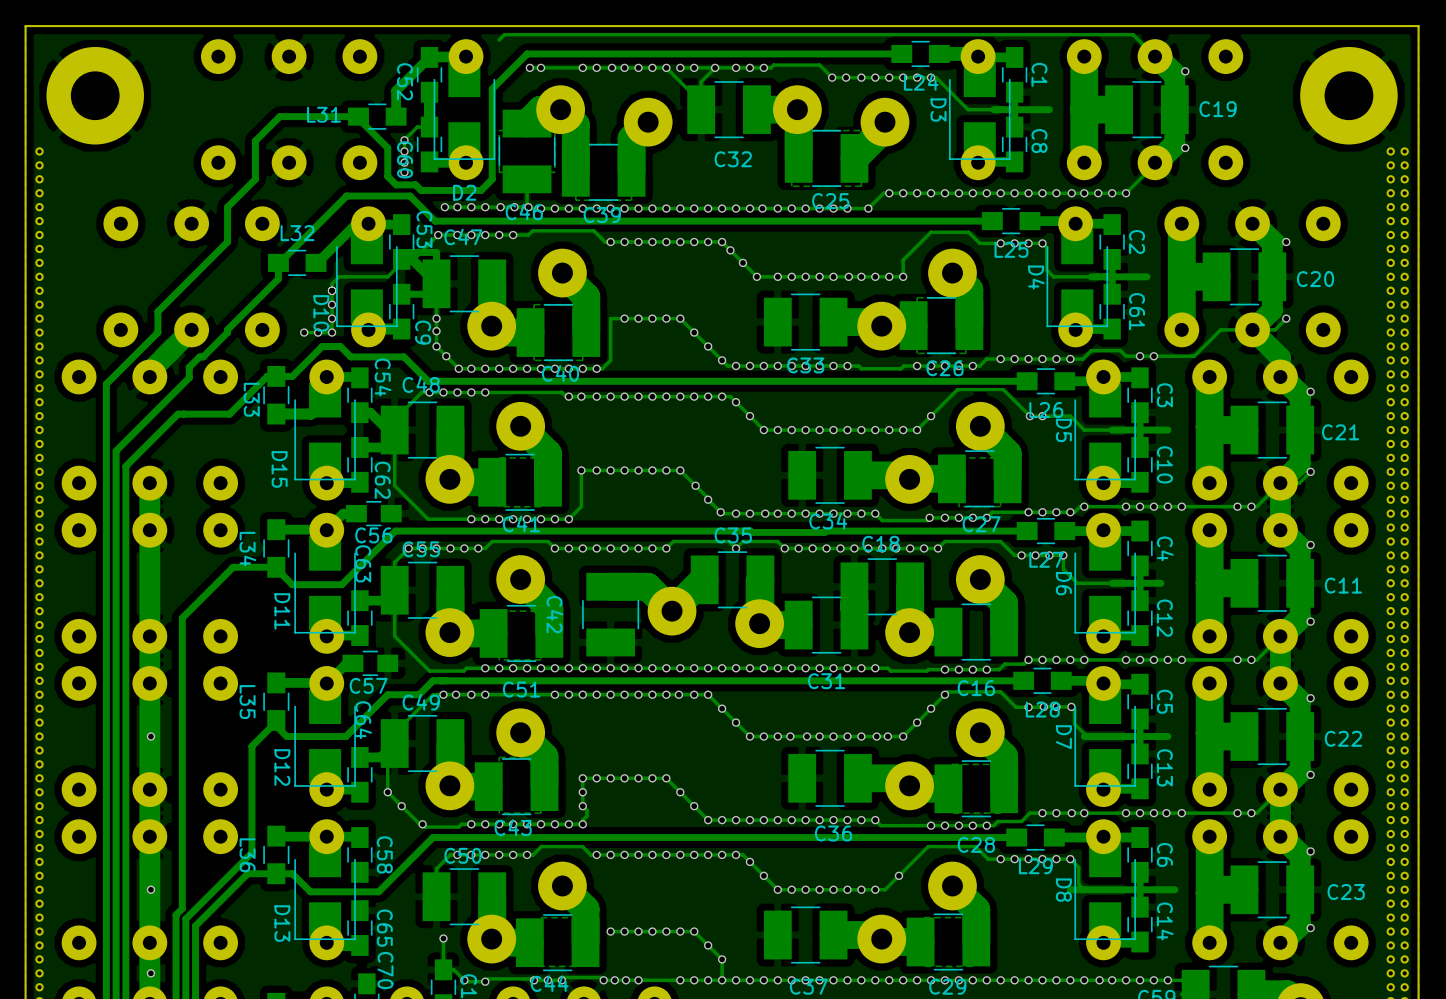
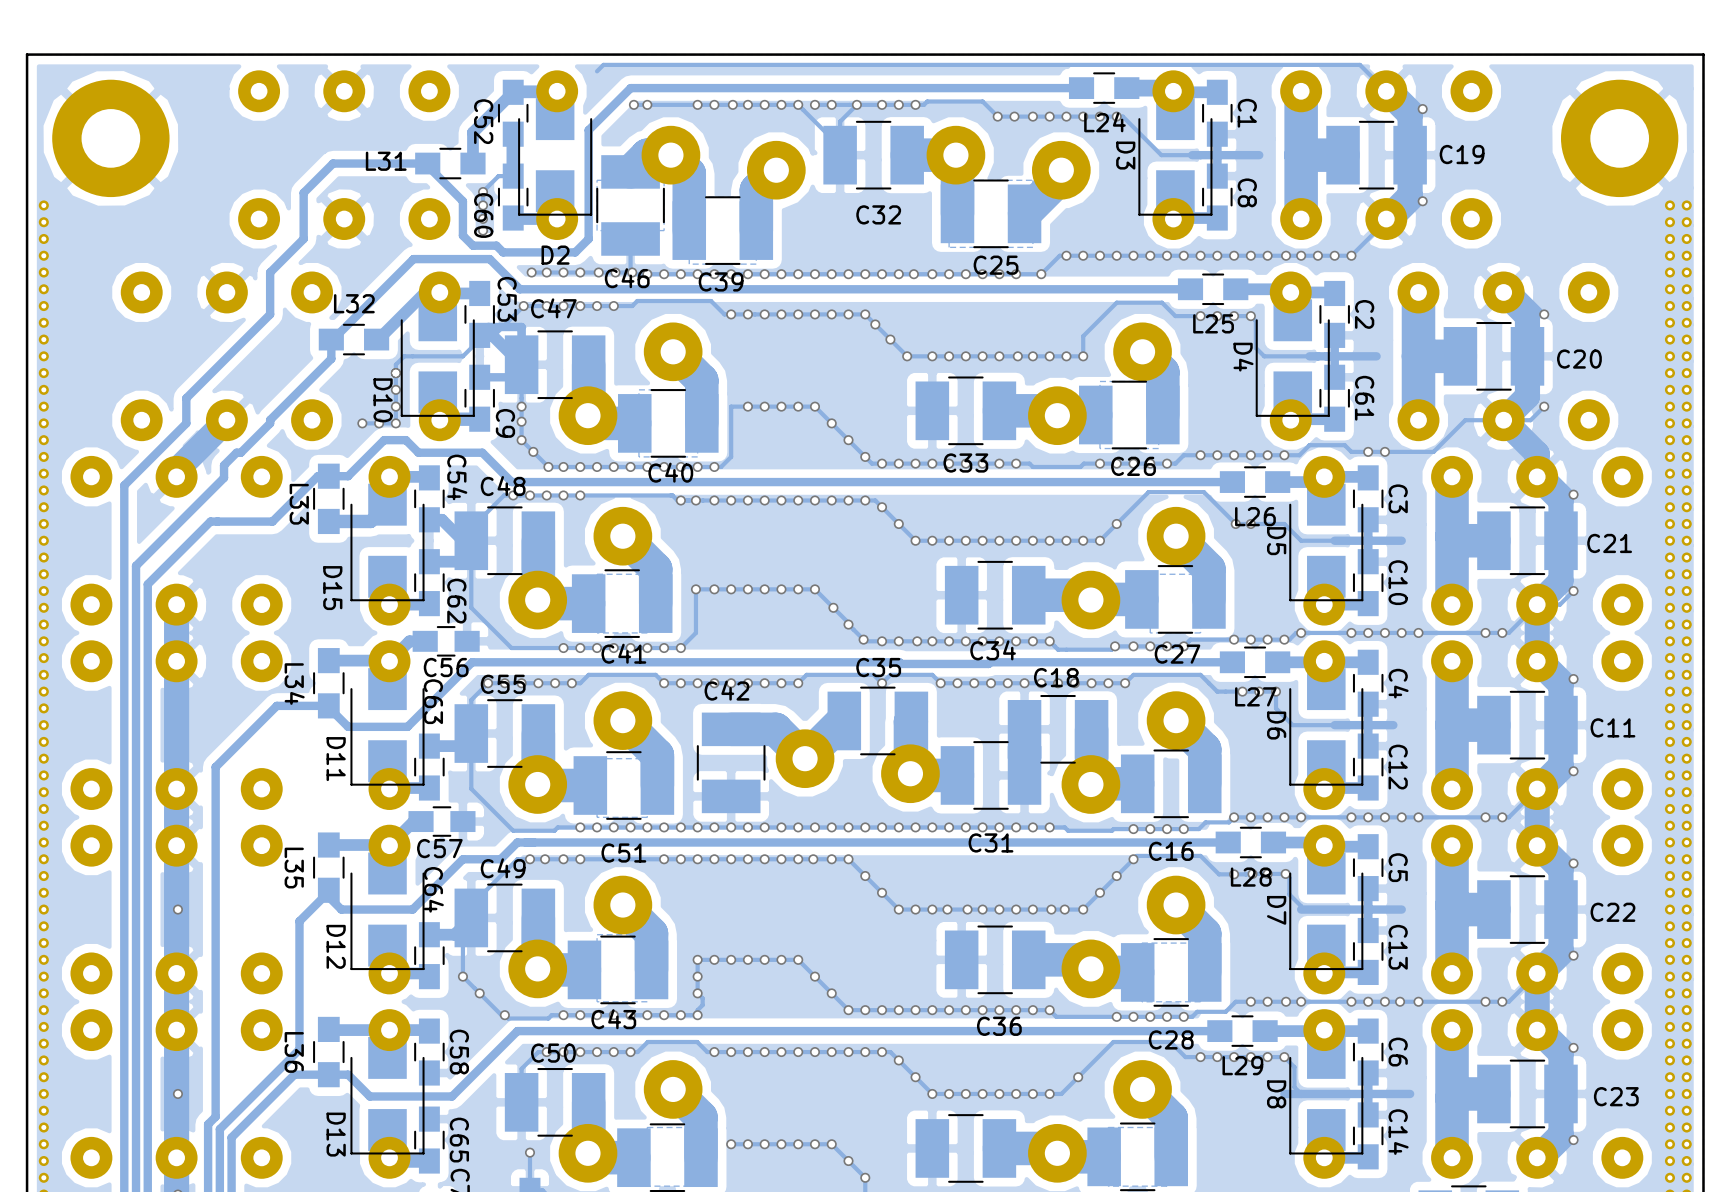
via: (1021, 555) -> none
C42 name rotation: 0° (554, 614) -> 90° counterclockwise (726, 690)
C42 name position: C42 (554, 614) -> C42 (726, 690)

